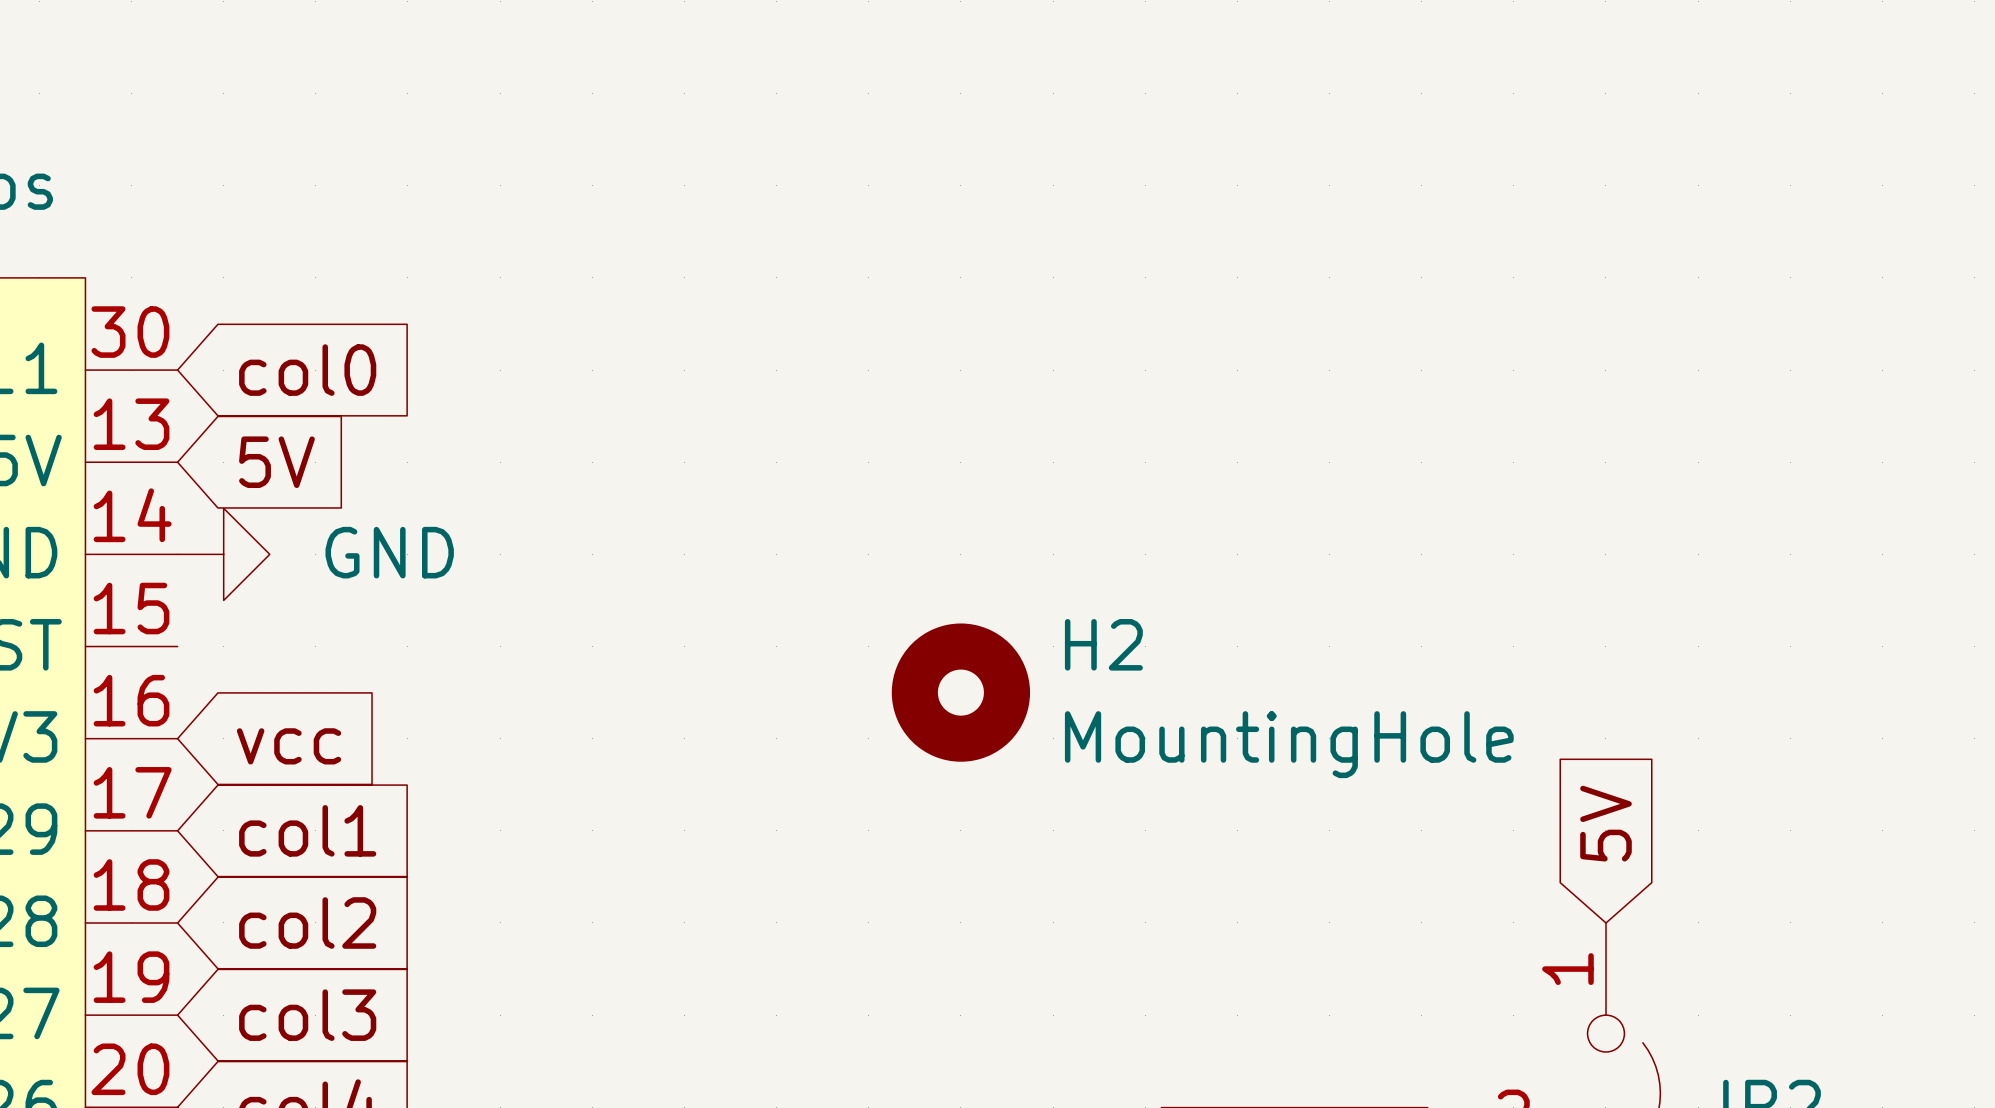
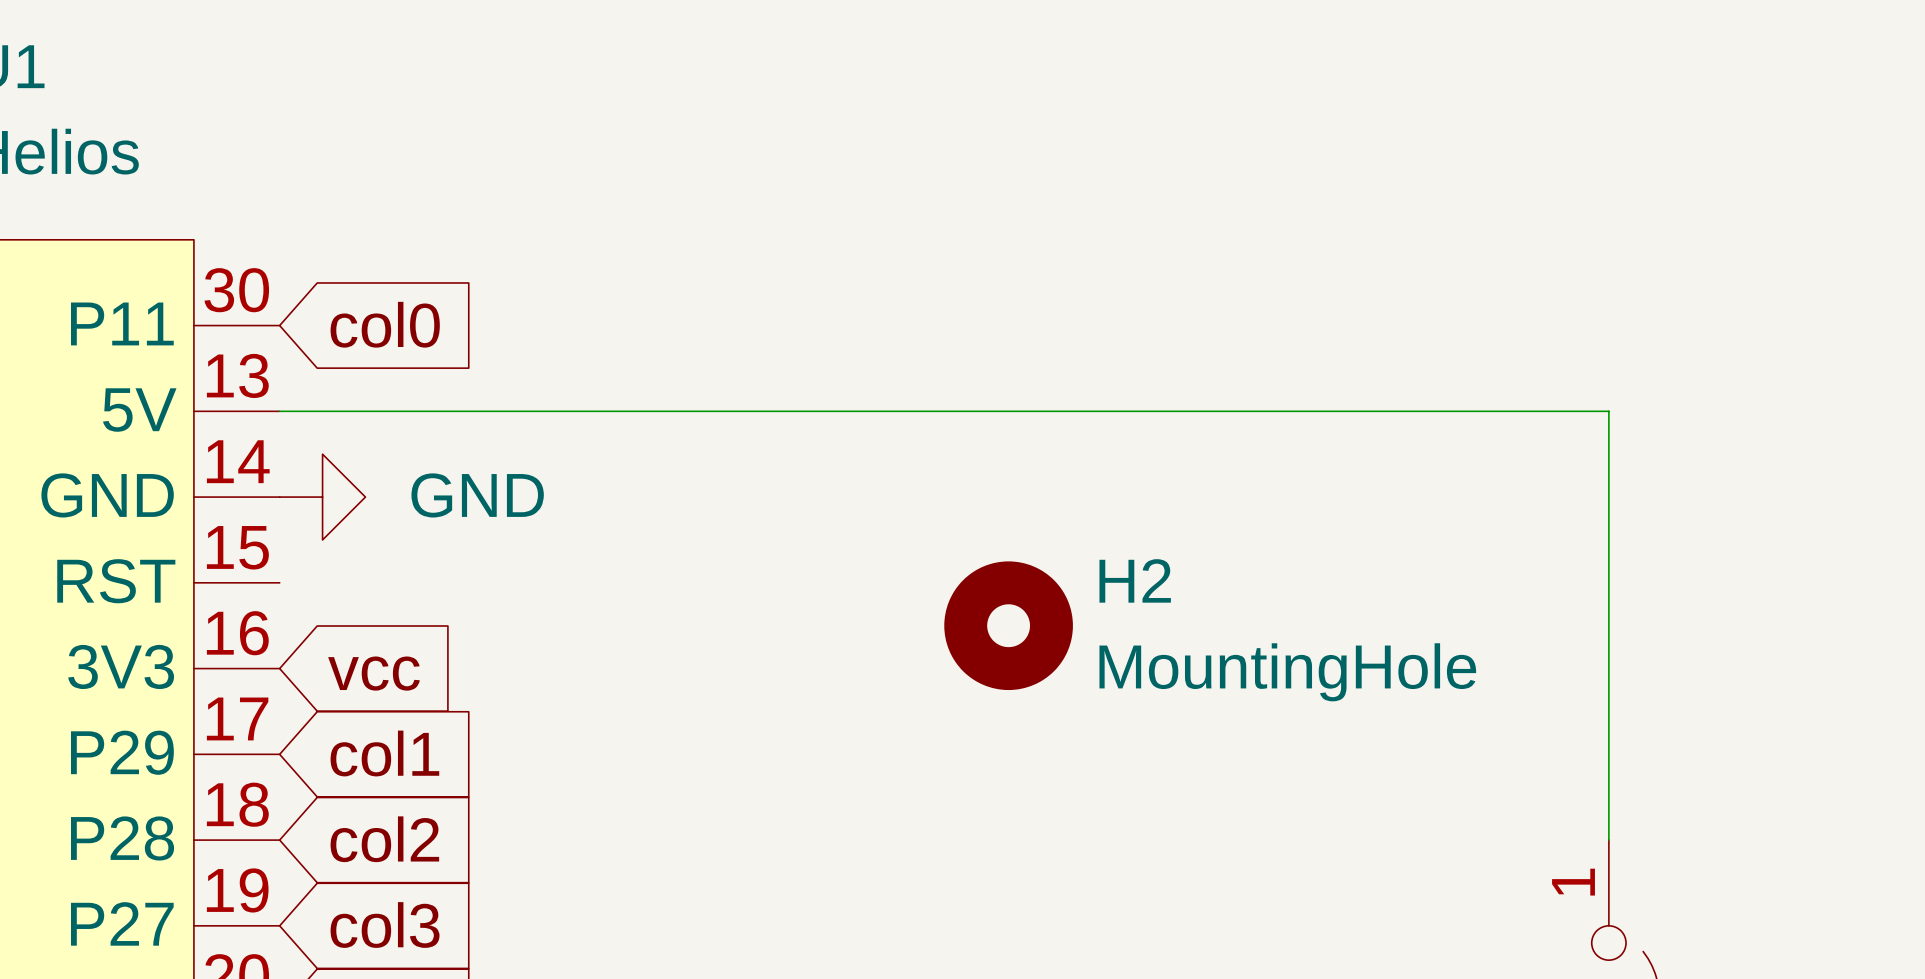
wire: none -> (279, 411) (1608, 411) (1608, 840)
global label: 5V (276, 462) -> none
global label: 5V (1605, 823) -> none

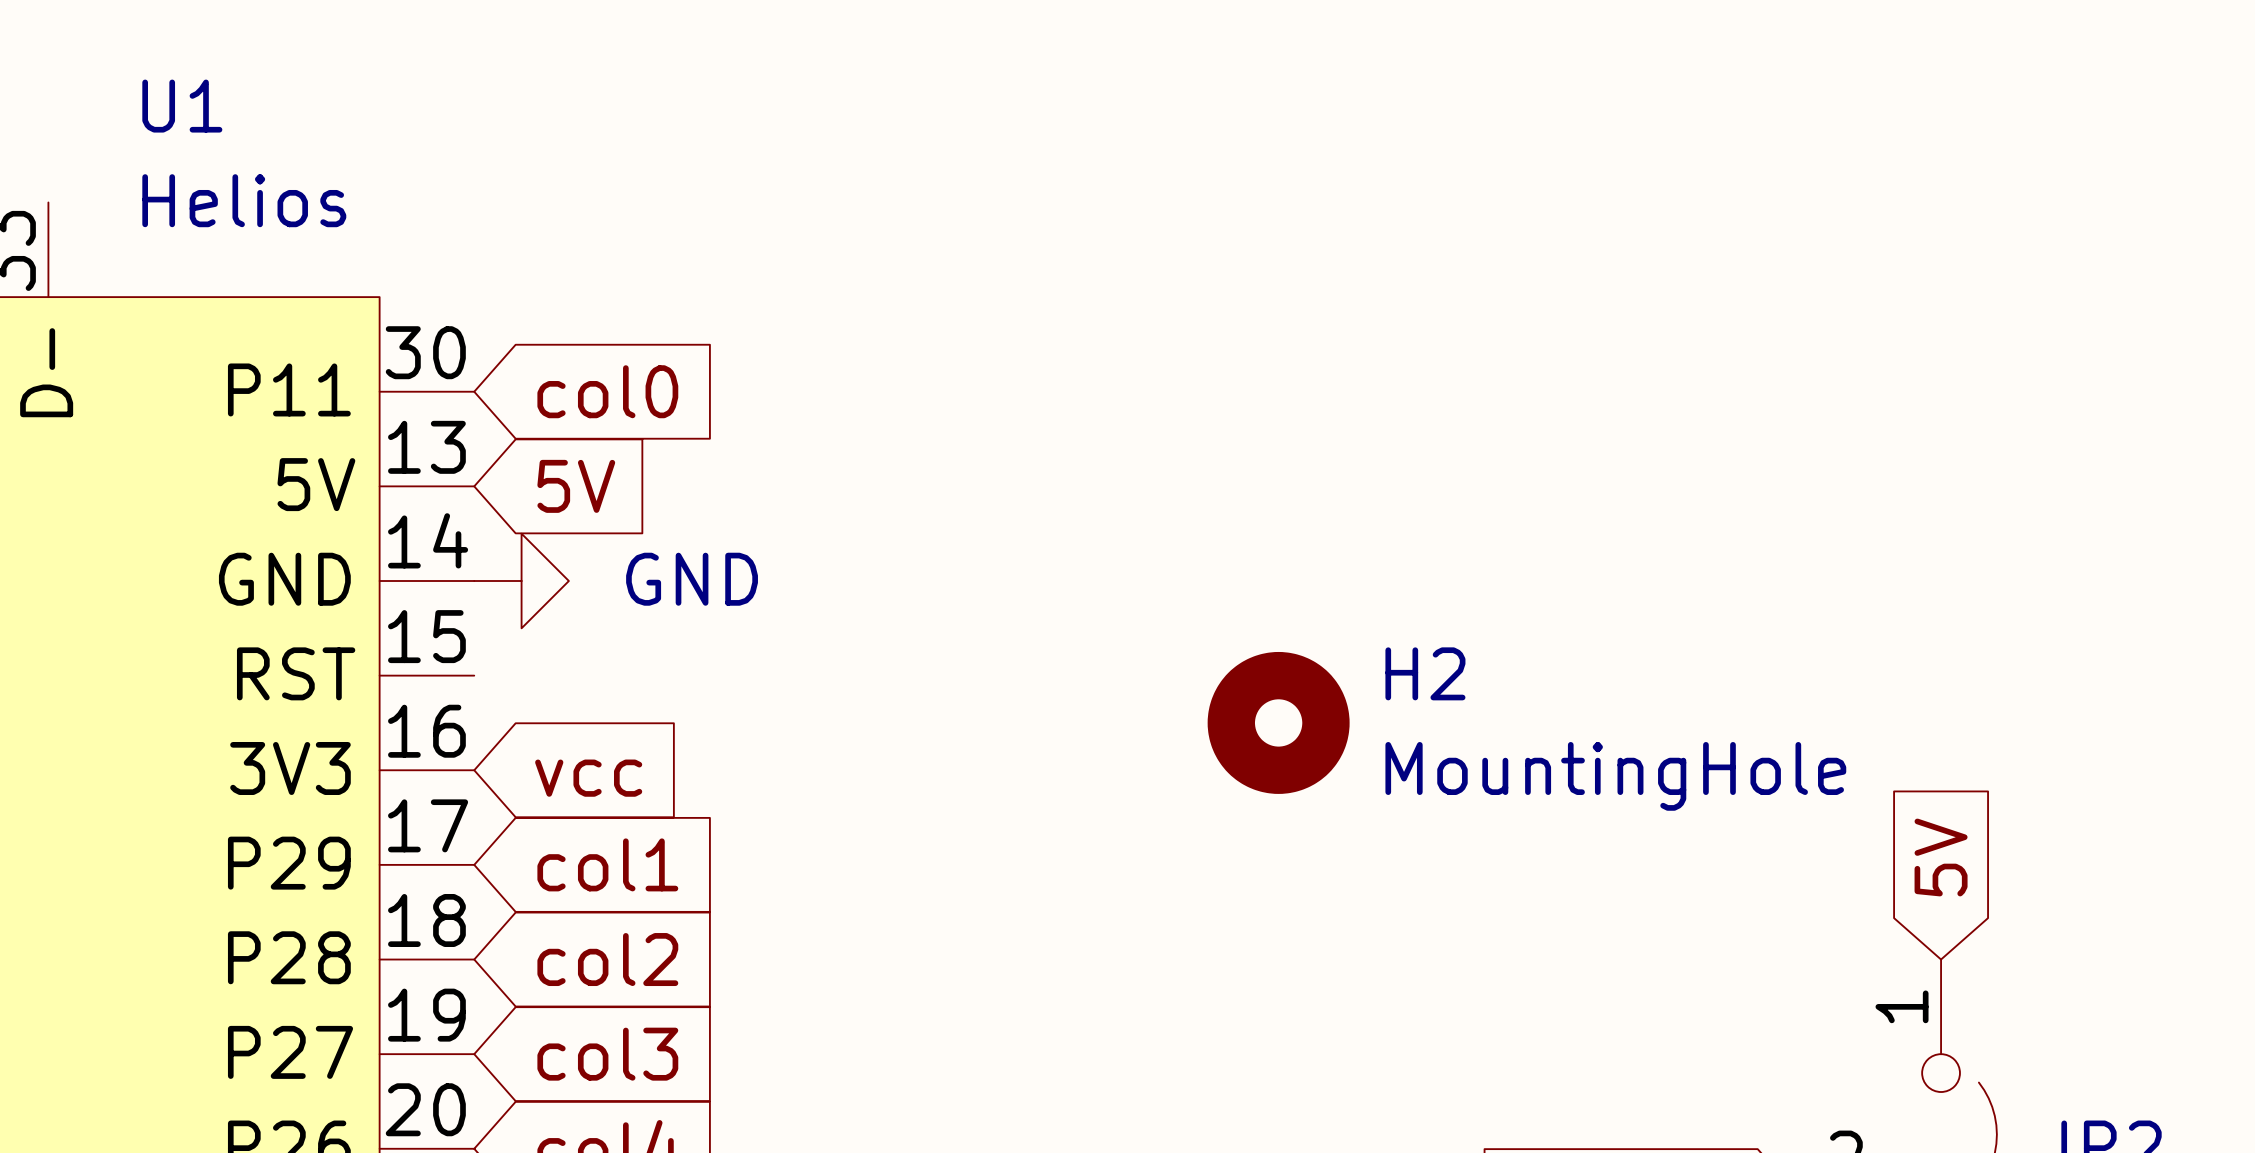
wire: (279, 411) (1608, 411) (1608, 840) -> none
global label: none -> 5V (576, 486)
global label: none -> 5V (1941, 857)

